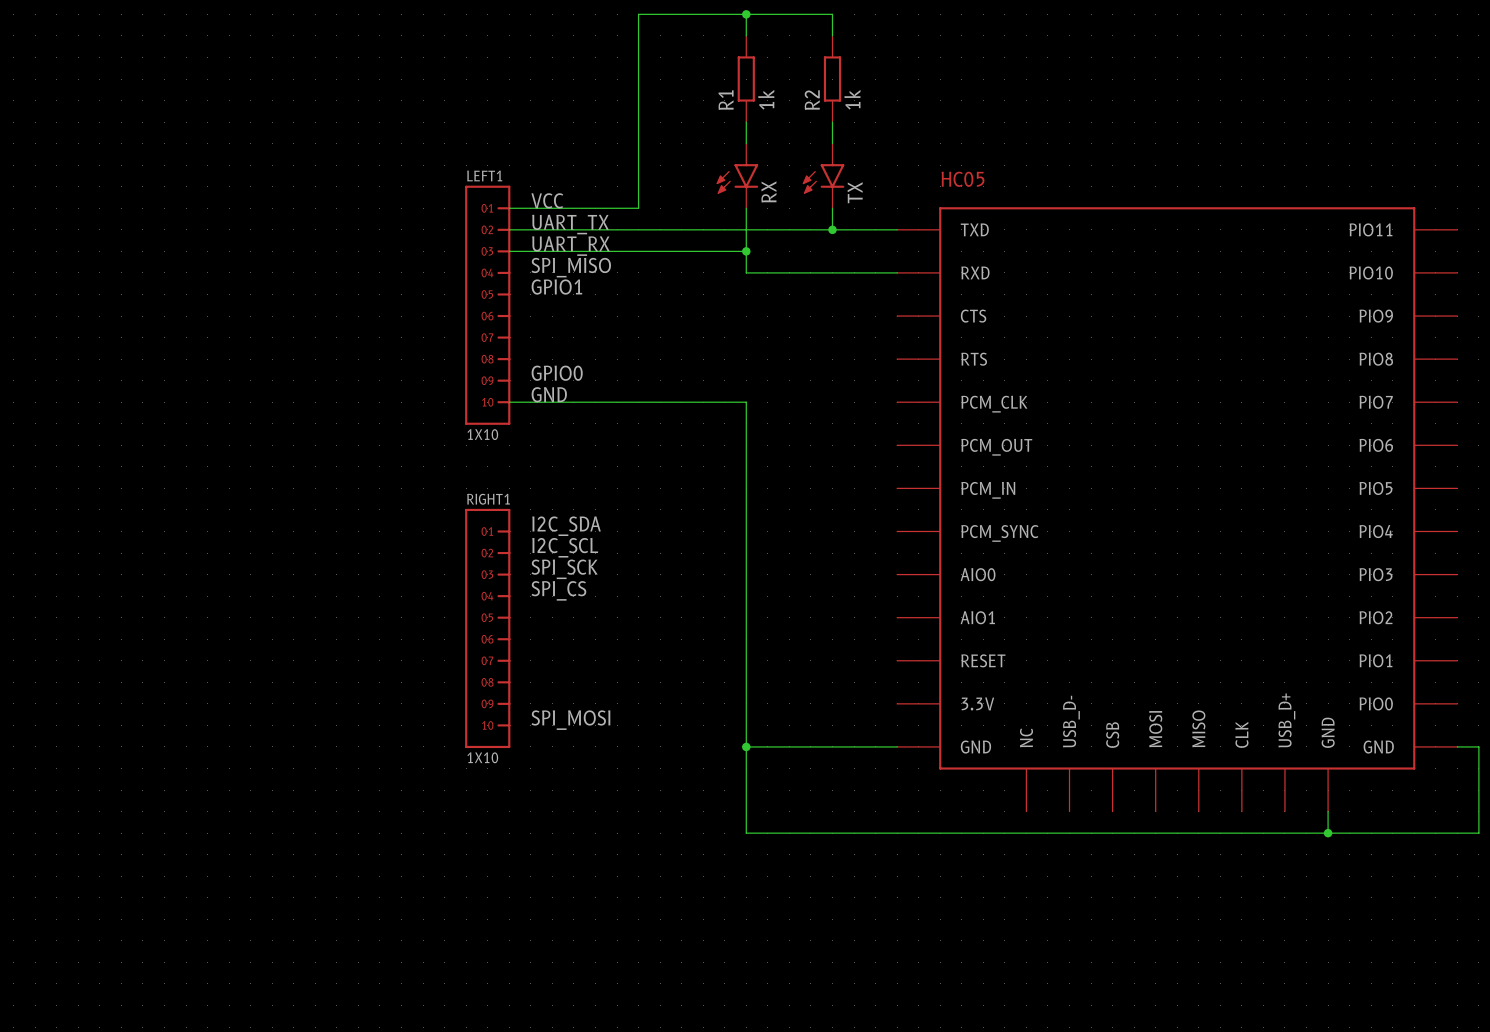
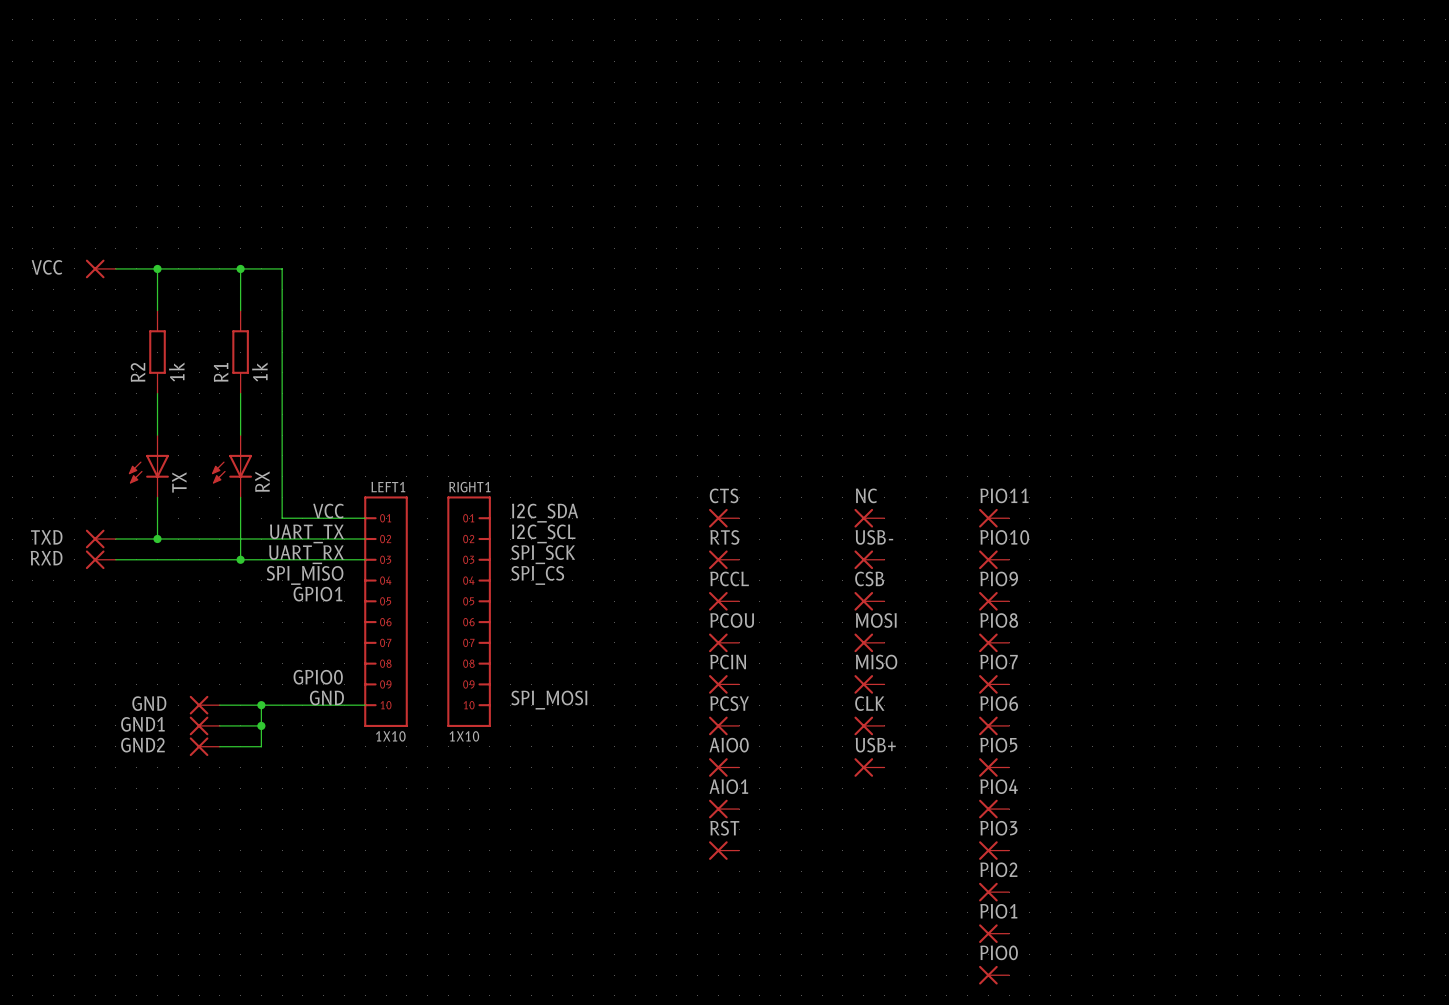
wire: (746, 14) (746, 35) -> none
junction: (746, 14) -> none
wire: (832, 35) (832, 14) (638, 14) (638, 208) (509, 208) -> none
R1 position: (746, 79) -> (240, 352)
R2 position: (832, 79) -> (157, 352)
wire: (746, 122) (746, 143) -> none
wire: (832, 122) (832, 143) -> none
RX: (737, 175) -> none
TX: (823, 175) -> none
text: VCC (547, 200) -> none
wire: (746, 208) (746, 272) (897, 272) -> none
wire: (832, 208) (832, 229) -> none
text: UART_TX (570, 224) -> none
wire: (509, 229) (897, 229) -> none
junction: (832, 229) -> none
text: UART_RX (570, 246) -> none
wire: (509, 251) (746, 251) -> none
junction: (746, 251) -> none
text: SPI_MISO (571, 267) -> none
VCC: none -> (100, 268)
wire: none -> (115, 268) (282, 268) (282, 518) (365, 518)
wire: none -> (157, 268) (157, 310)
junction: none -> (157, 268)
wire: none -> (240, 268) (240, 310)
junction: none -> (240, 268)
text: GPIO1 (556, 287) -> none
LEFT1 flip: as is (487, 305) -> left-right (386, 611)
LEFT1 position: (487, 305) -> (386, 611)
text: GPIO0 (557, 373) -> none
text: GND (549, 394) -> none
wire: none -> (157, 393) (157, 435)
wire: none -> (240, 393) (240, 435)
wire: (509, 402) (746, 402) (746, 833) (1478, 833) (1478, 746) (1457, 746) -> none
TX: none -> (148, 466)
RX: none -> (231, 466)
wire: none -> (157, 497) (157, 539)
wire: none -> (240, 497) (240, 559)
part: (1177, 509) -> none
text: none -> VCC (328, 511)
CTS: none -> (724, 518)
NC: none -> (869, 518)
PIO11: none -> (994, 518)
text: none -> UART_TX (306, 533)
TXD: none -> (100, 539)
wire: none -> (115, 539) (365, 539)
junction: none -> (157, 539)
text: none -> UART_RX (306, 554)
RXD: none -> (100, 559)
wire: none -> (115, 559) (365, 559)
junction: none -> (240, 559)
RTS: none -> (724, 559)
USB-: none -> (869, 559)
PIO10: none -> (994, 559)
text: none -> SPI_MISO (305, 575)
text: none -> GPIO1 (317, 594)
PCCL: none -> (724, 601)
CSB: none -> (869, 601)
PIO9: none -> (994, 601)
PCOU: none -> (724, 642)
MOSI: none -> (869, 642)
PIO8: none -> (994, 642)
text: none -> GPIO0 (318, 677)
PCIN: none -> (724, 684)
MISO: none -> (869, 684)
PIO7: none -> (994, 684)
text: none -> GND (326, 697)
GND: none -> (204, 705)
wire: none -> (219, 705) (365, 705)
wire: none -> (261, 705) (261, 746) (219, 746)
junction: none -> (261, 705)
GND1: none -> (204, 725)
wire: none -> (219, 725) (261, 725)
junction: none -> (261, 725)
wire: (746, 746) (897, 746) -> none
junction: (746, 746) -> none
PCSY: none -> (724, 725)
CLK: none -> (869, 725)
PIO6: none -> (994, 725)
GND2: none -> (204, 746)
AIO0: none -> (724, 767)
USB+: none -> (869, 767)
PIO5: none -> (994, 767)
wire: (1328, 811) (1328, 833) -> none
AIO1: none -> (724, 809)
PIO4: none -> (994, 809)
junction: (1328, 833) -> none
RST: none -> (724, 850)
PIO3: none -> (994, 850)
PIO2: none -> (994, 892)
PIO1: none -> (994, 933)
PIO0: none -> (994, 975)

